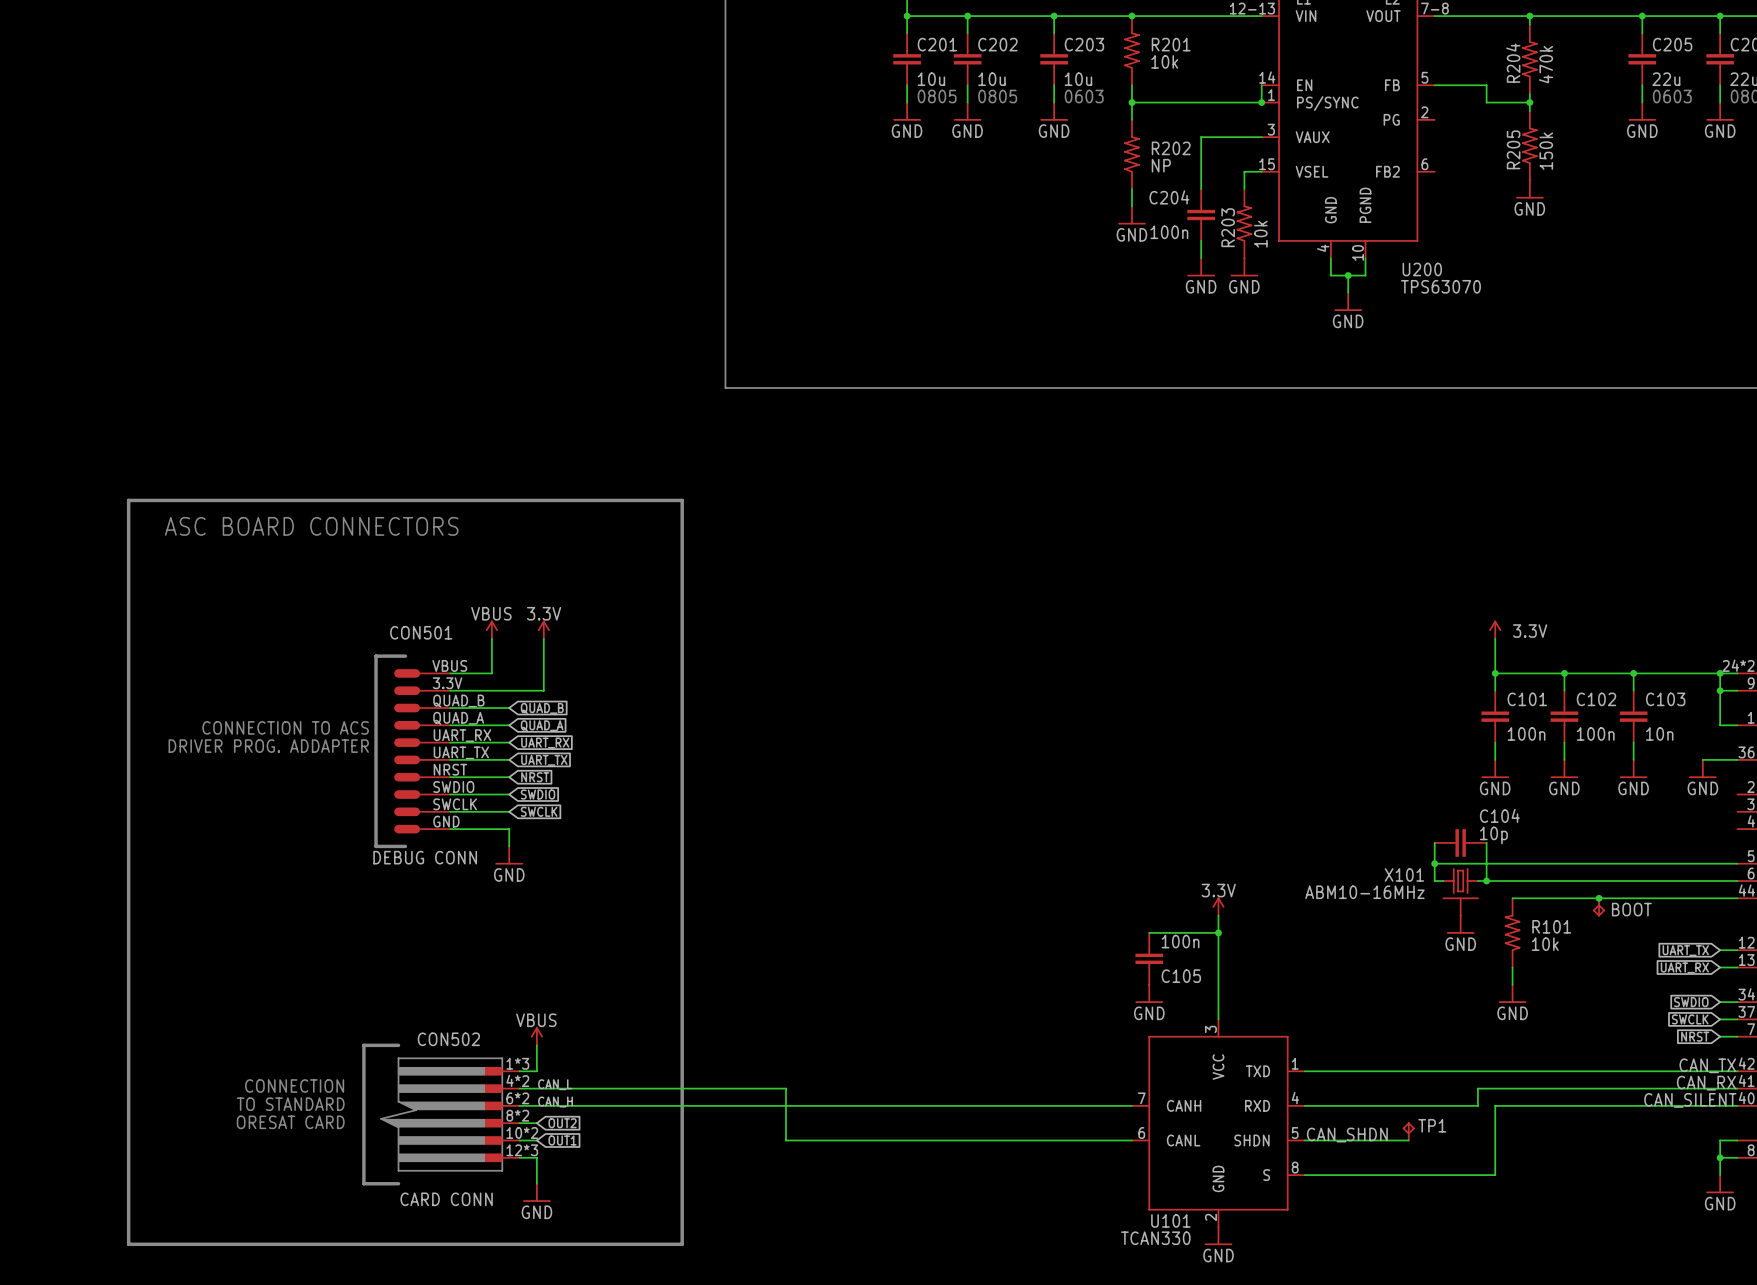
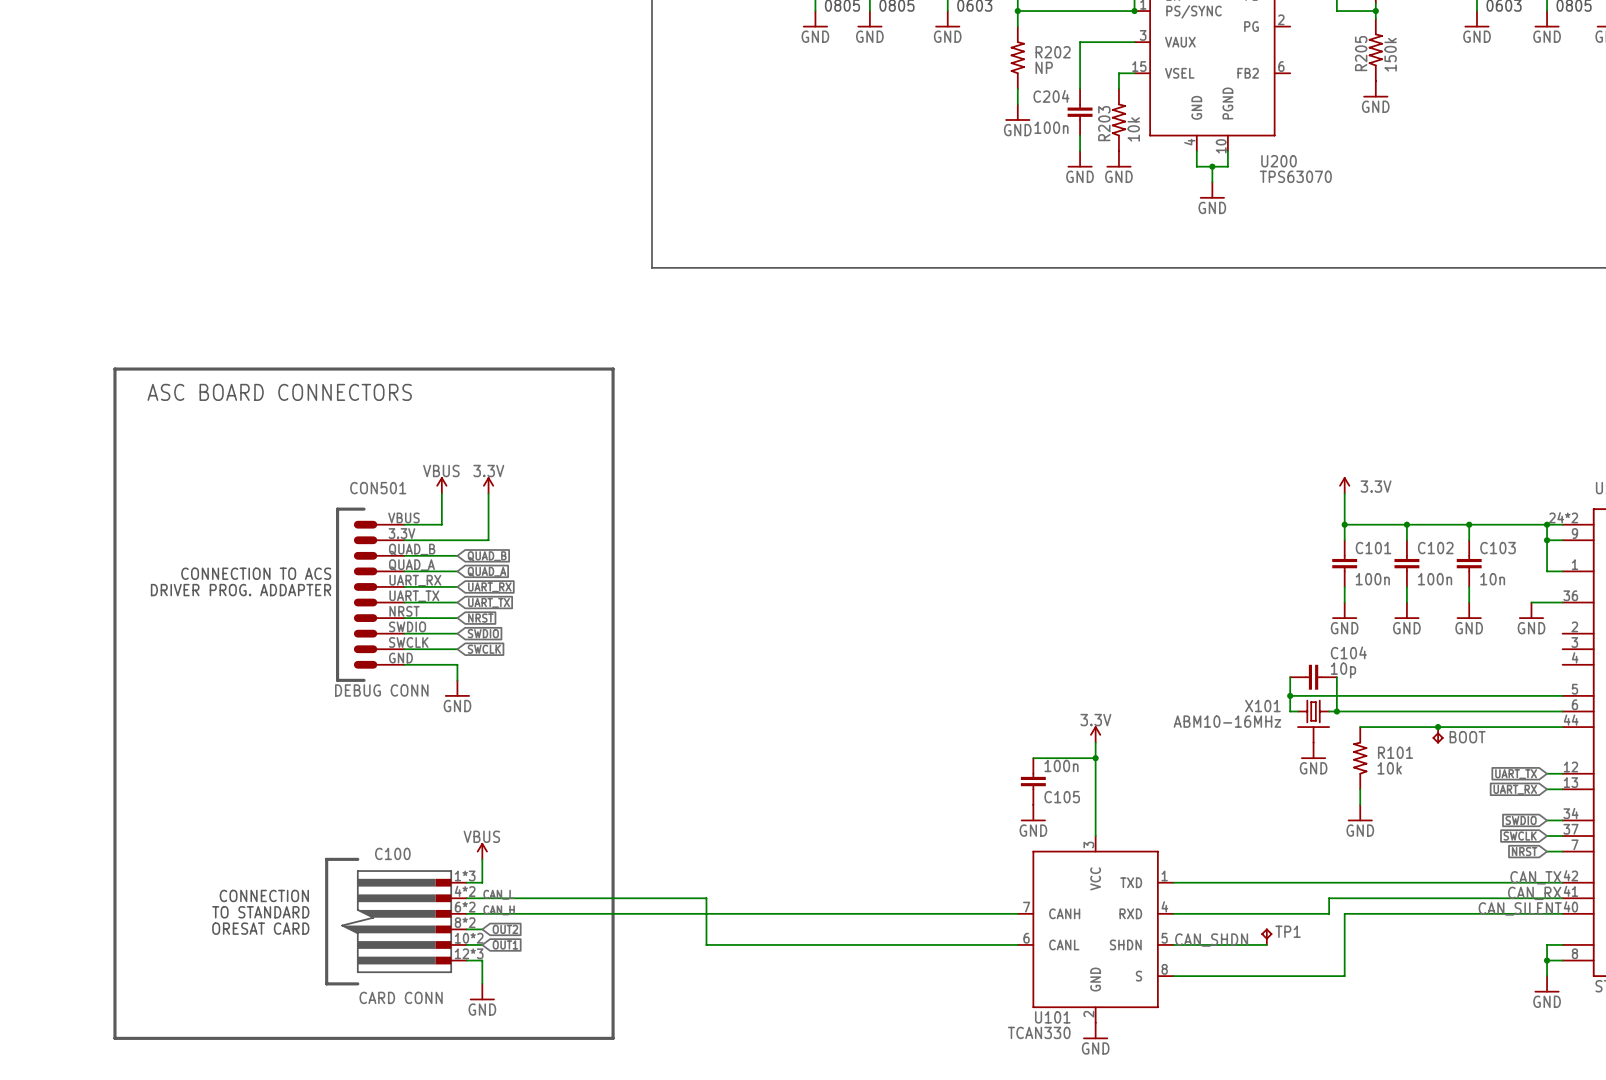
CON502 name: CON502 (448, 1039) -> C100 (392, 853)

